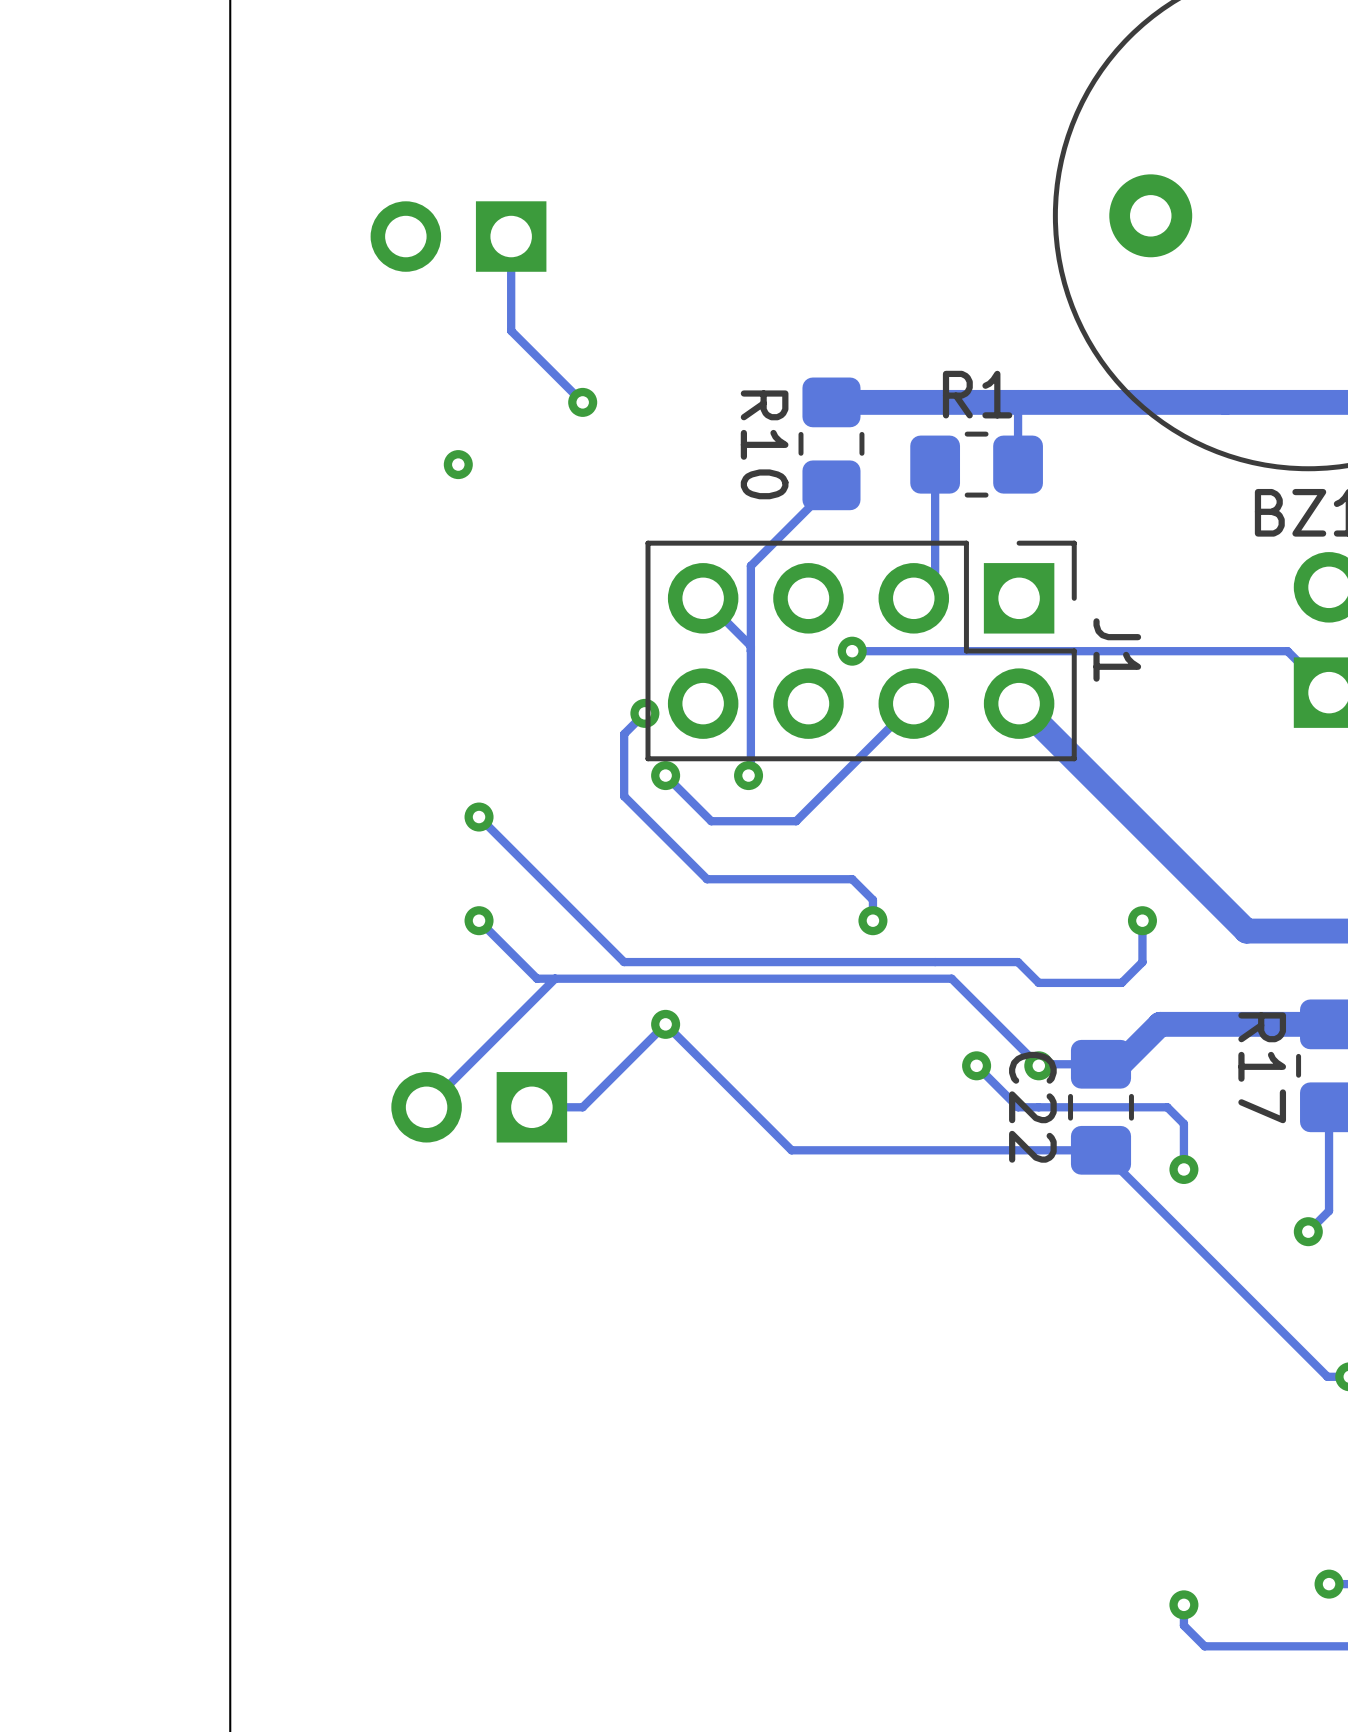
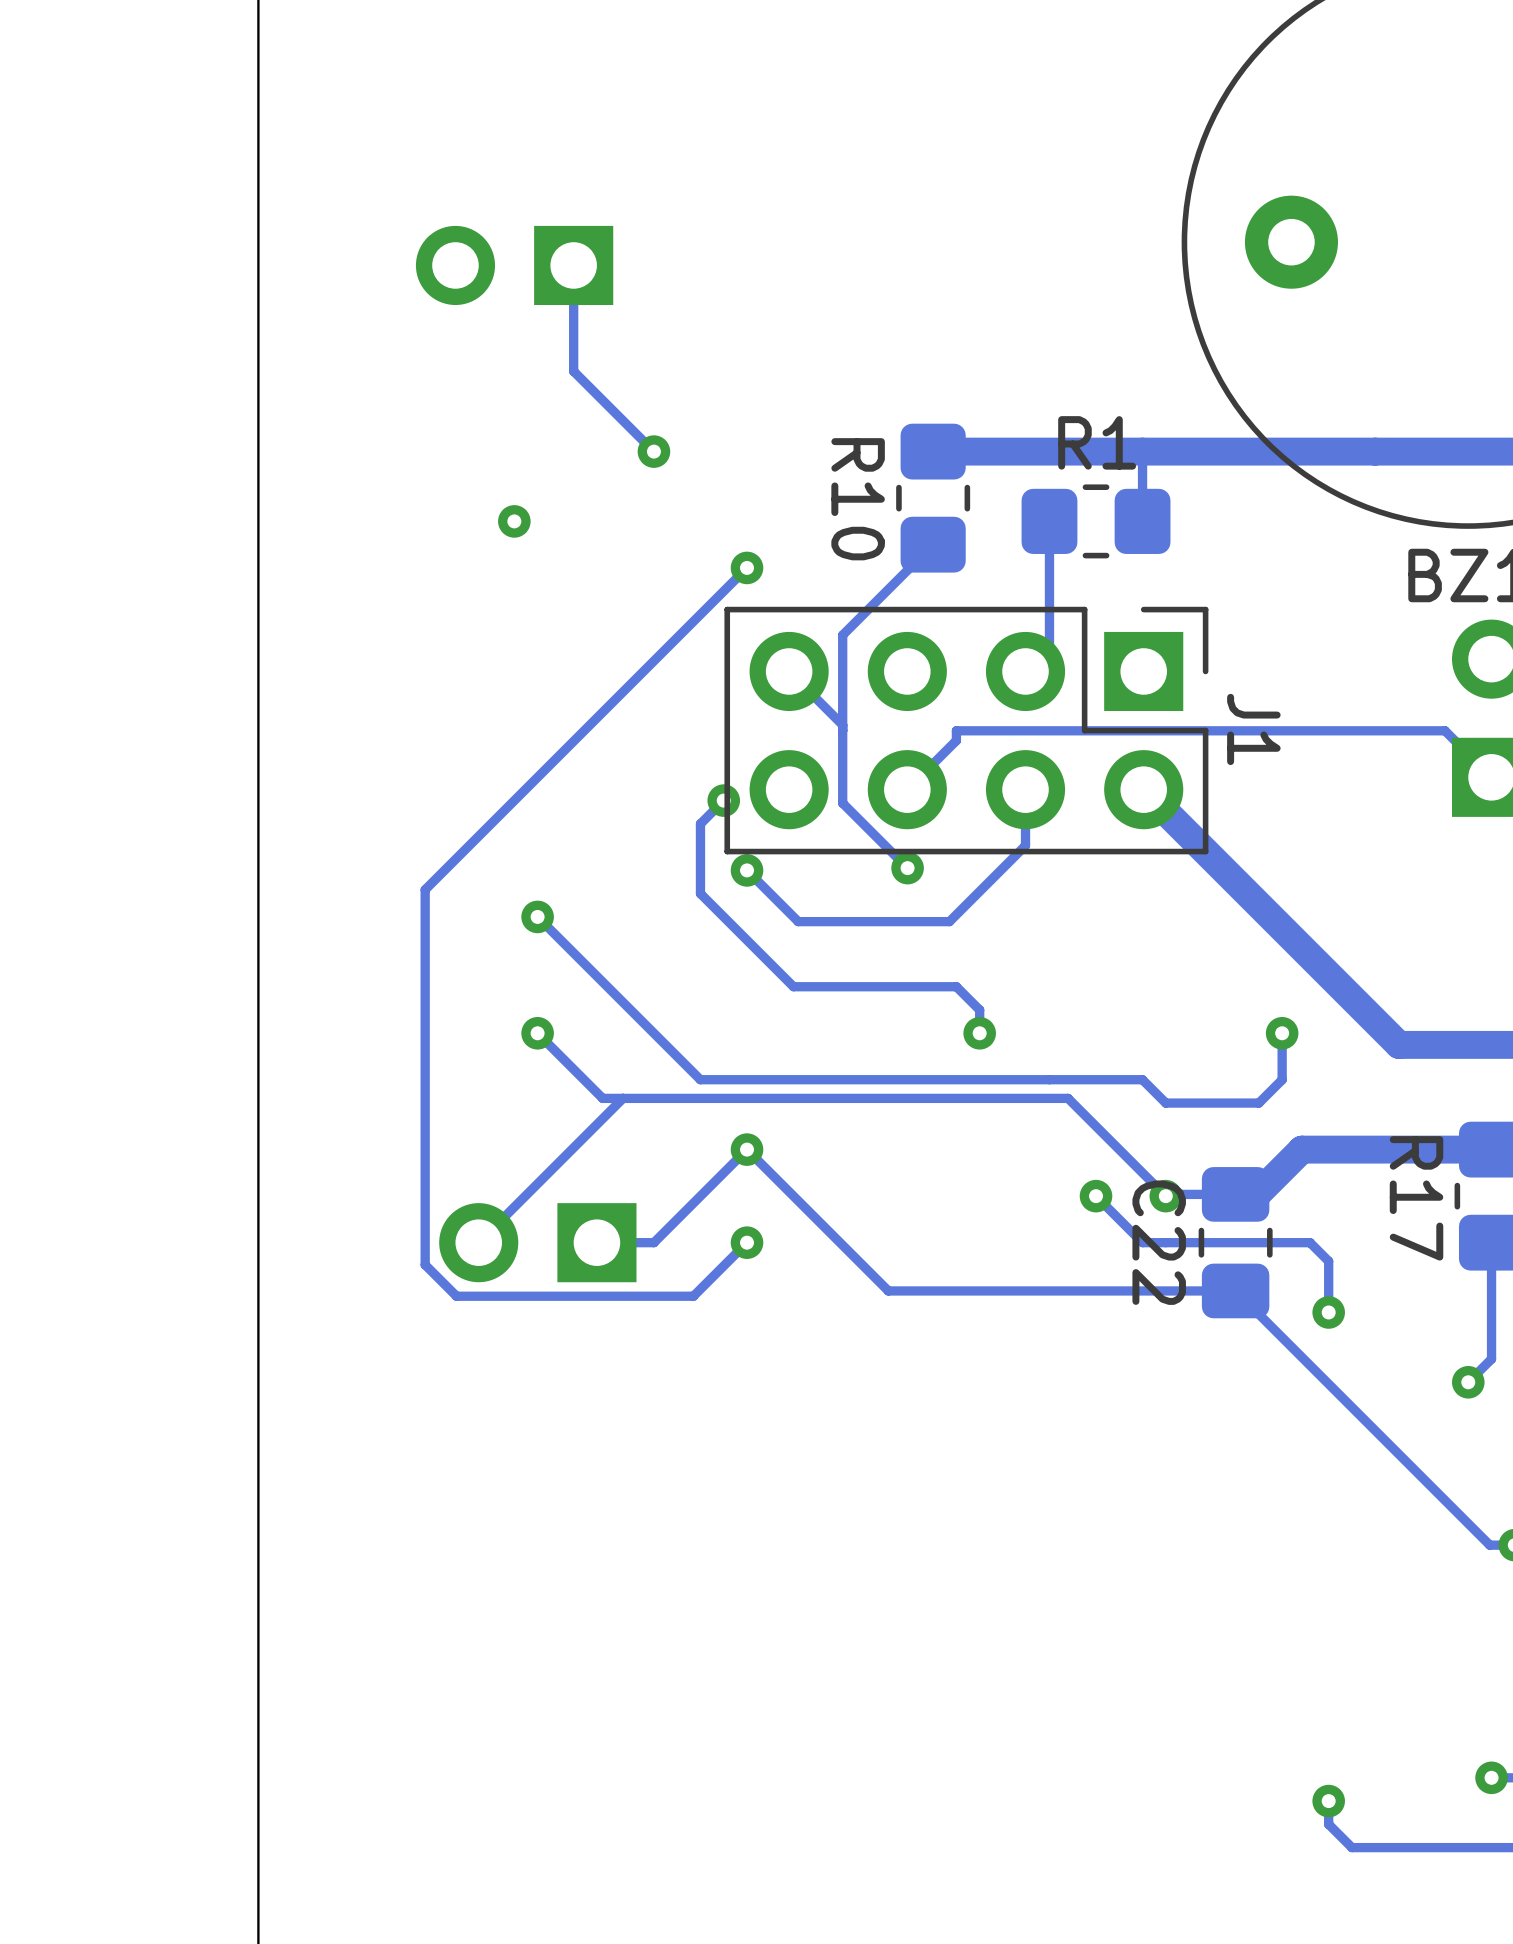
track: none -> (747, 567) (425, 889) (425, 1264) (456, 1296) (693, 1296) (747, 1242)
via: none -> (747, 567)
track: none -> (956, 730) (956, 740) (907, 789)
via: (852, 651) -> none
track: (913, 703) (796, 821) -> (1025, 789) (1025, 845) (949, 921) (893, 921)
track: (750, 715) (750, 773) (748, 775) -> (842, 803) (907, 868)
via position: (748, 775) -> (907, 868)
via: none -> (747, 1242)

